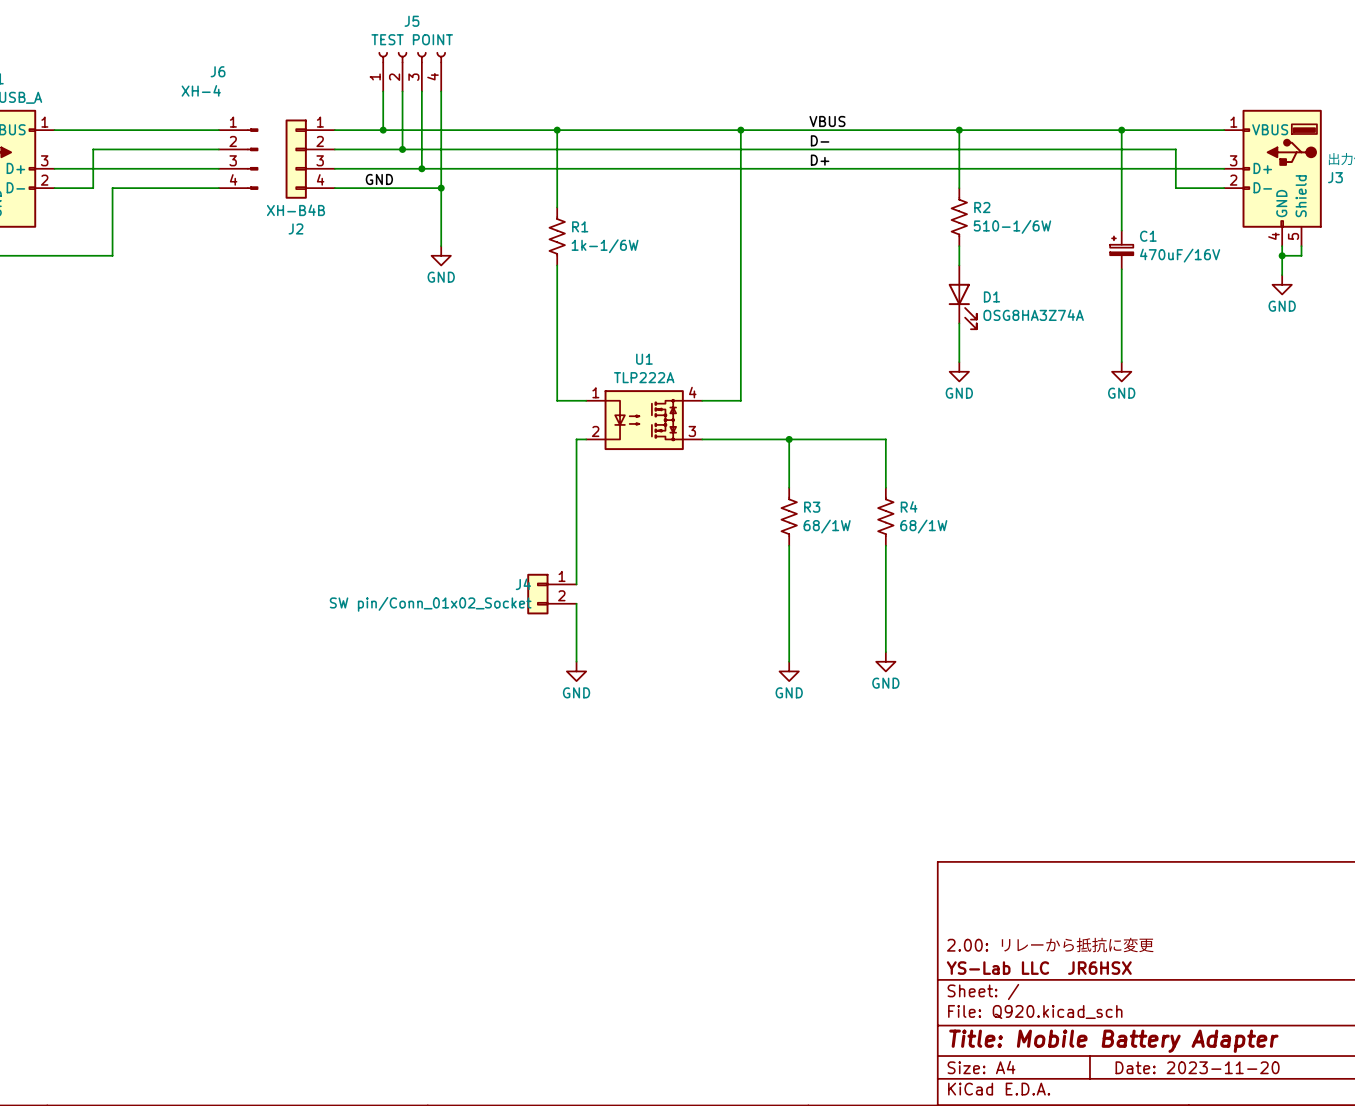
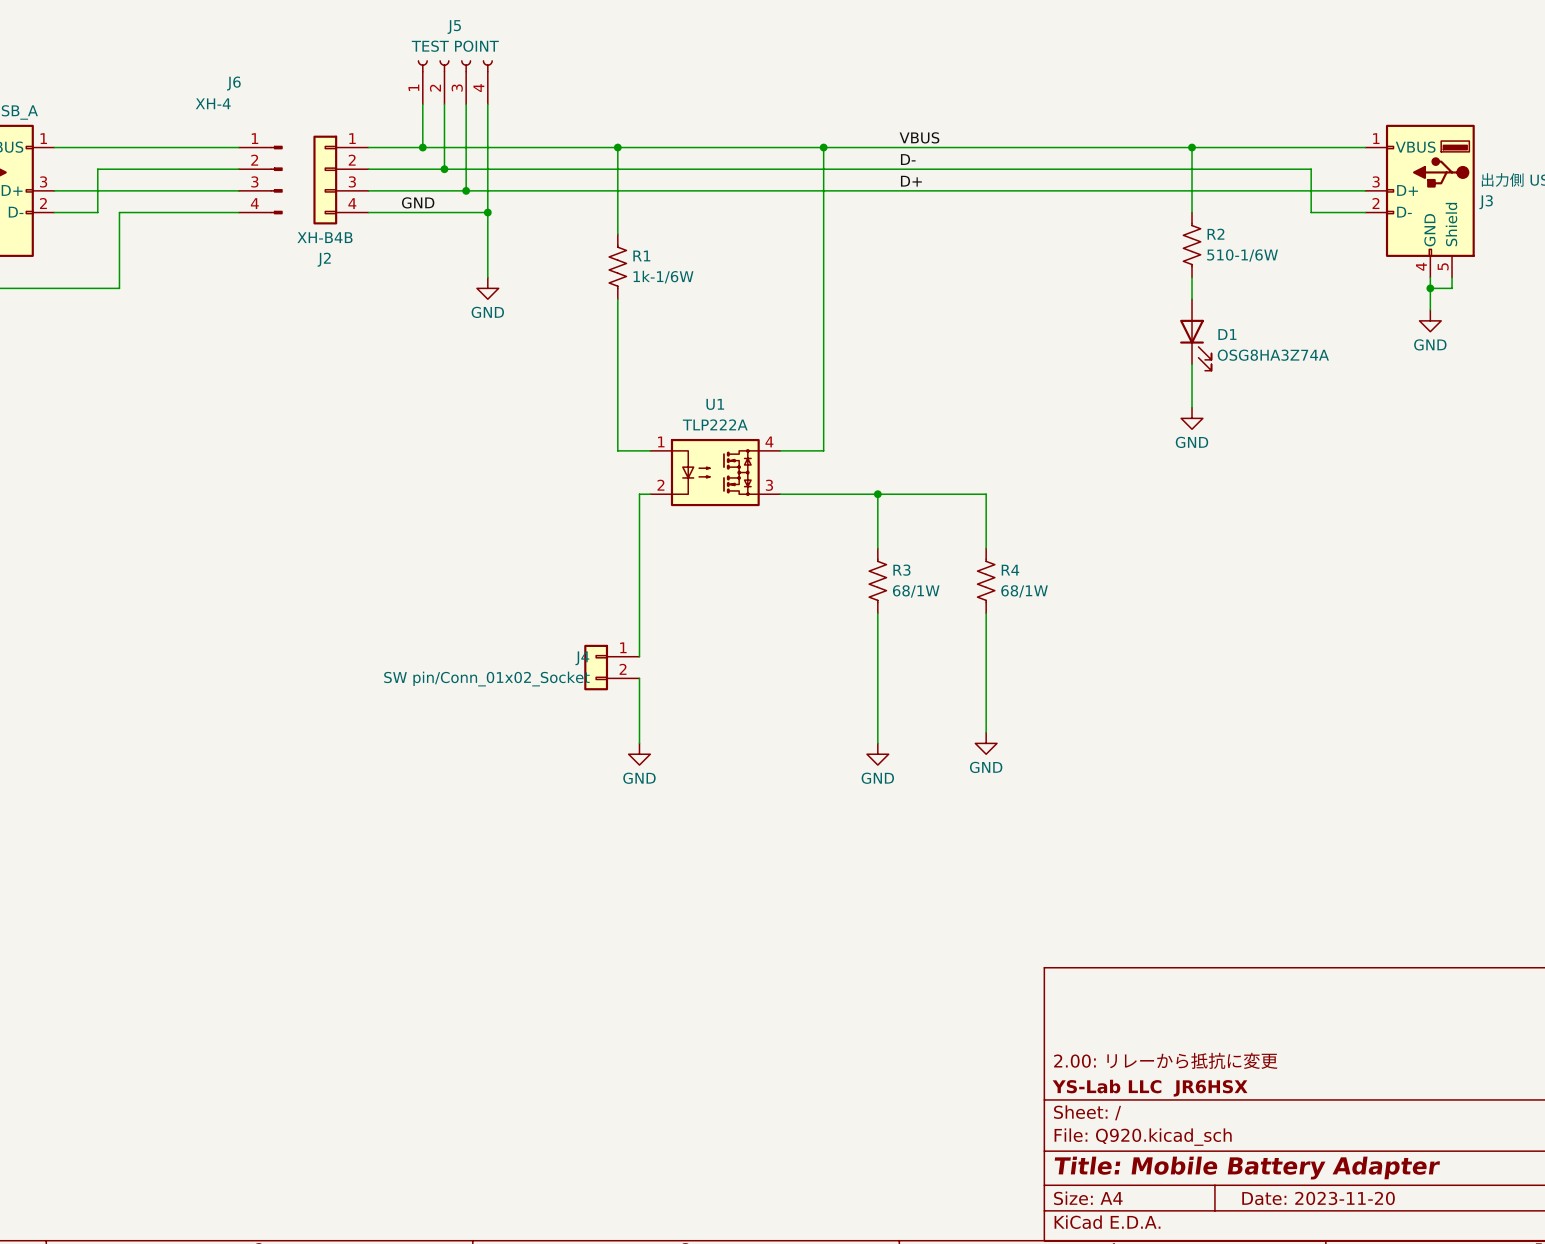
wire: (959, 130) (959, 188) -> (1192, 147) (1192, 212)
junction: (959, 130) -> none
junction: none -> (1192, 147)
wire: (1121, 130) (1121, 230) -> none
junction: (1121, 130) -> none
R2 position: (959, 217) -> (1192, 245)
wire: (959, 246) (959, 265) -> (1192, 277) (1192, 299)
C1: 470uF/16V (1121, 249) -> none
wire: (1121, 269) (1121, 362) -> none
D1 position: (962, 297) -> (1195, 334)
wire: (959, 323) (959, 362) -> (1192, 364) (1192, 407)
power symbol: GND (959, 371) -> none
power symbol position: GND (1121, 371) -> GND (1192, 418)

